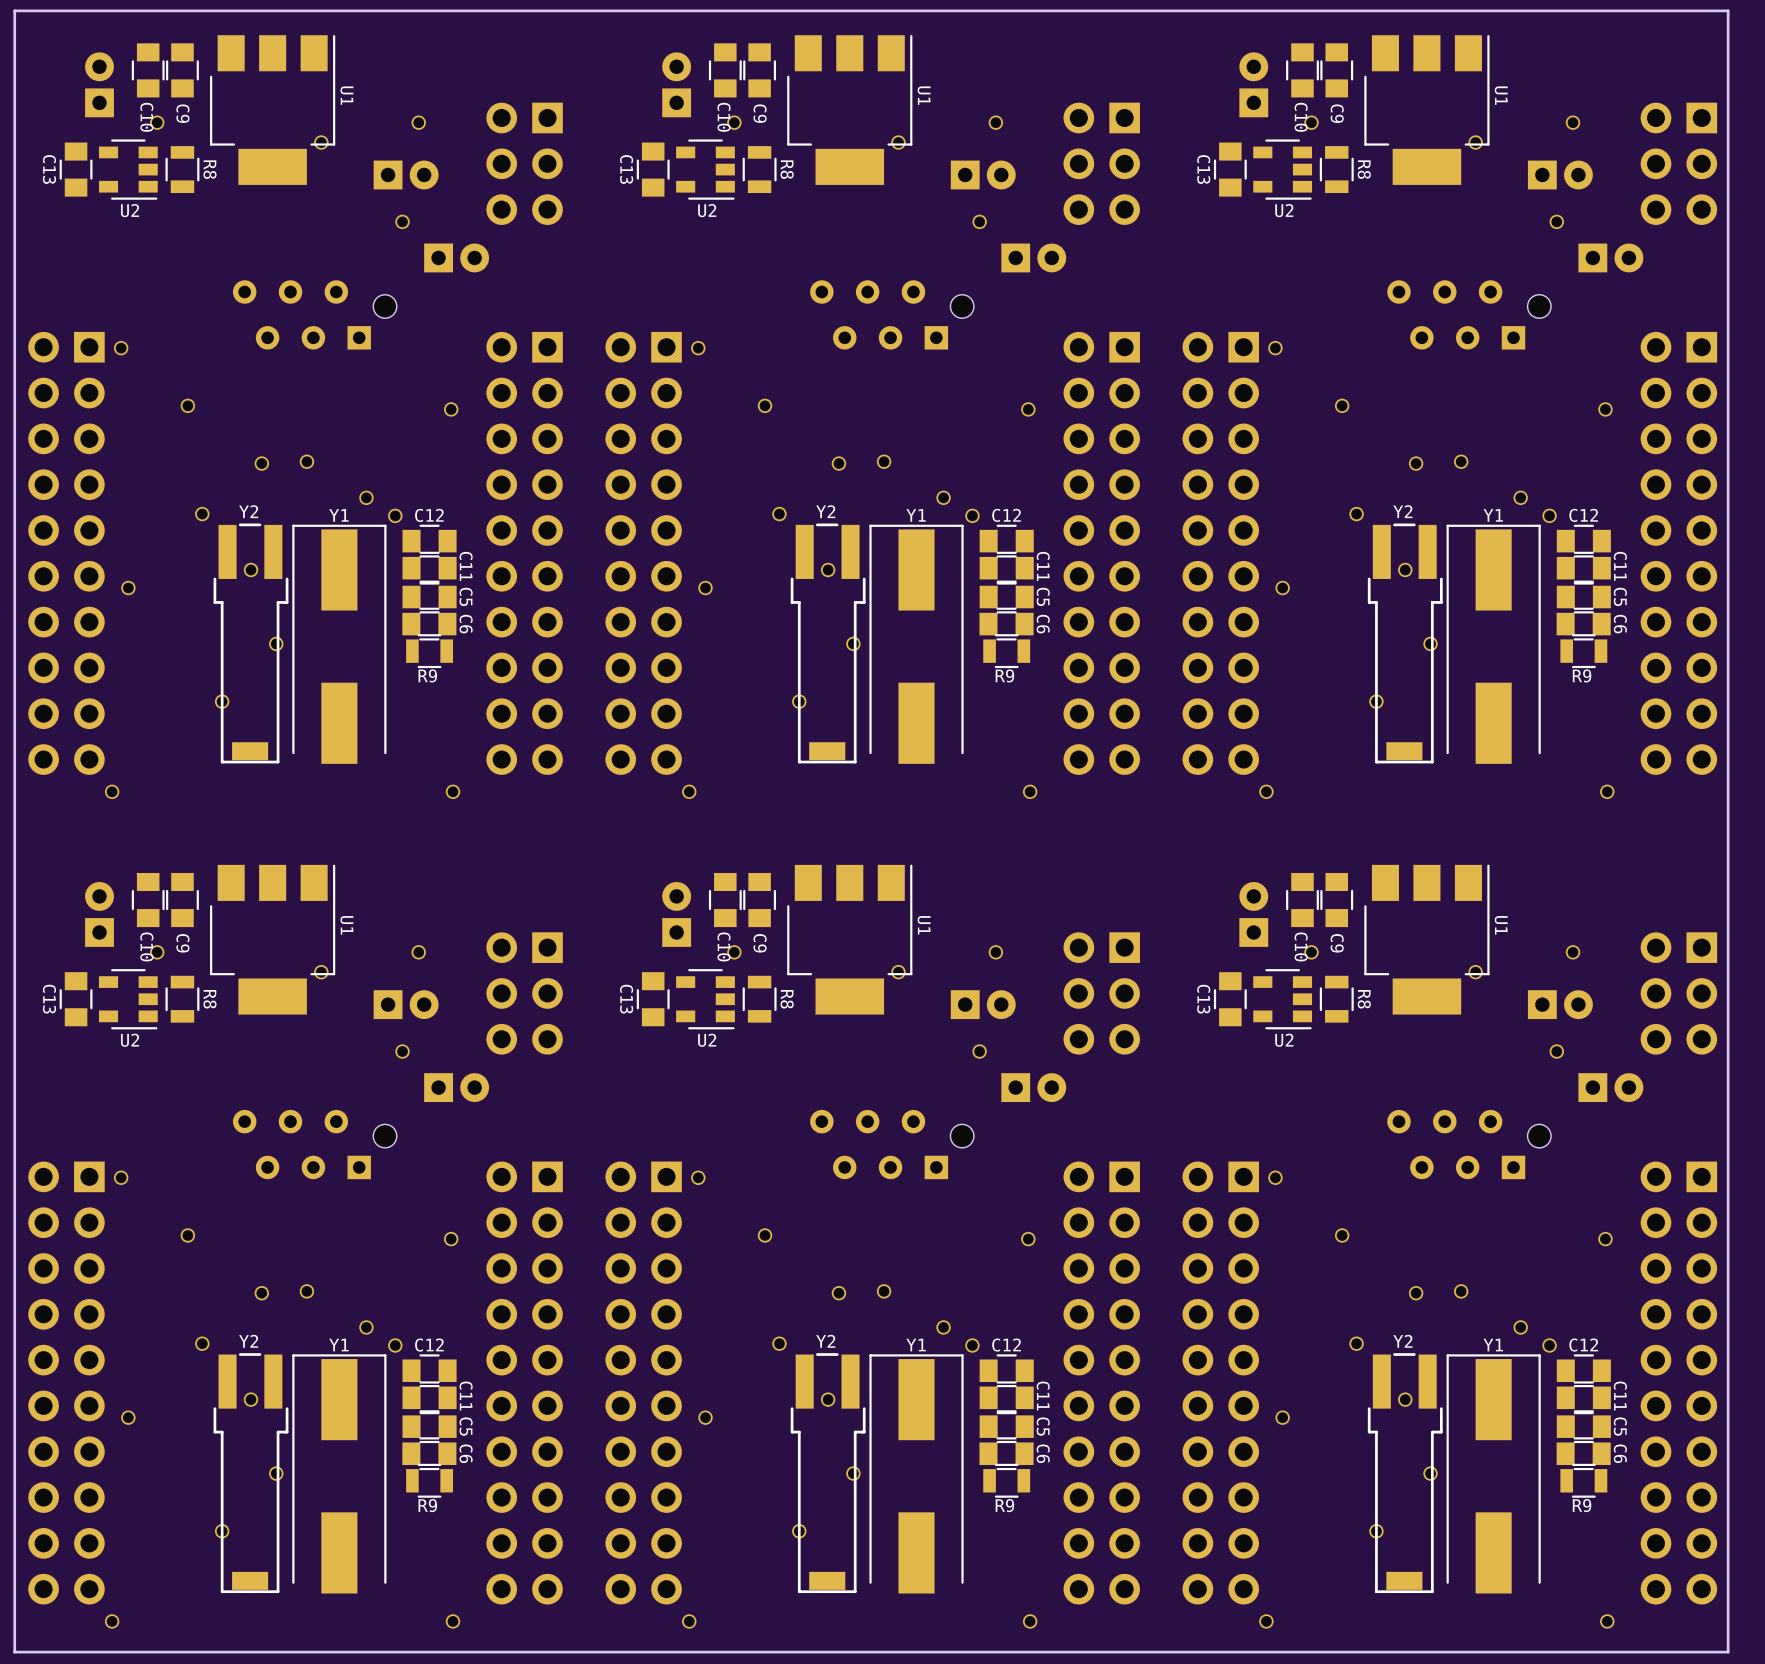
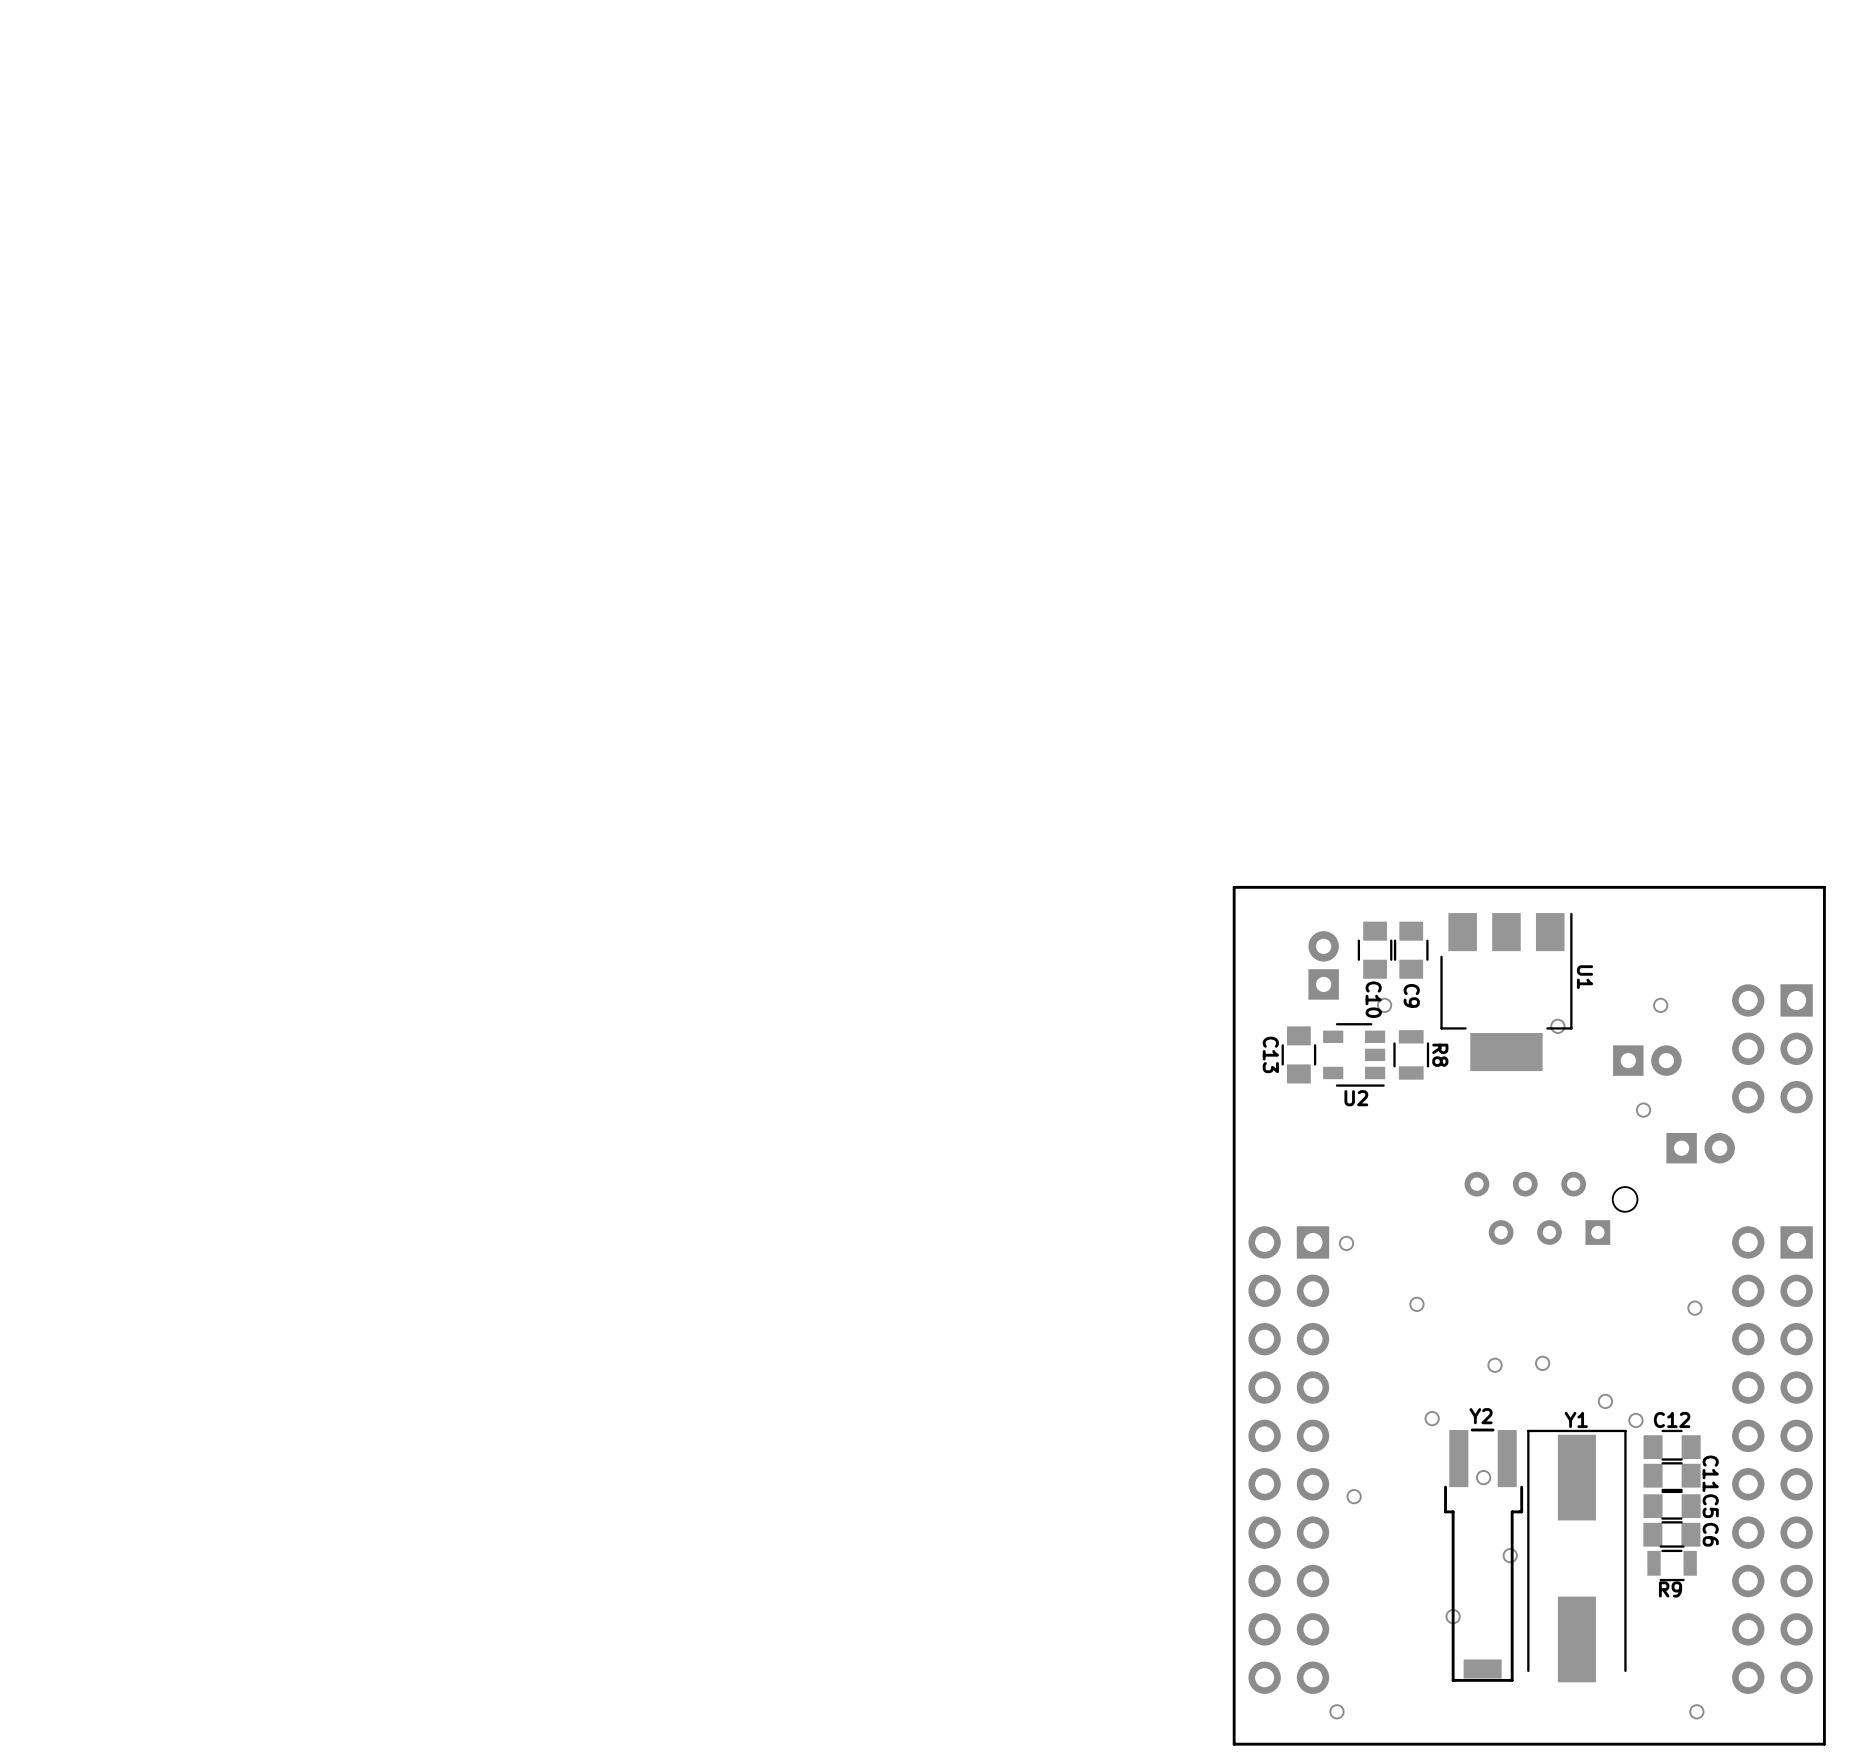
C10: (148, 70) -> none
C9: (182, 70) -> none
C10: (725, 70) -> none
C9: (759, 70) -> none
C10: (1302, 70) -> none
C9: (1336, 70) -> none
part: (99, 84) -> none
part: (676, 84) -> none
part: (1253, 84) -> none
U1: (272, 109) -> none
U1: (849, 109) -> none
U1: (1426, 109) -> none
part: (157, 122) -> none
part: (418, 122) -> none
part: (734, 122) -> none
part: (995, 122) -> none
part: (1311, 122) -> none
part: (1573, 122) -> none
part: (321, 142) -> none
part: (898, 142) -> none
part: (1475, 142) -> none
part: (524, 163) -> none
part: (1101, 163) -> none
part: (1678, 163) -> none
C13: (76, 169) -> none
U2: (128, 169) -> none
R8: (182, 169) -> none
C13: (653, 169) -> none
U2: (705, 169) -> none
R8: (759, 169) -> none
C13: (1230, 169) -> none
U2: (1282, 169) -> none
R8: (1336, 169) -> none
part: (406, 174) -> none
part: (983, 174) -> none
part: (1560, 174) -> none
part: (402, 221) -> none
part: (979, 221) -> none
part: (1556, 221) -> none
part: (456, 257) -> none
part: (1033, 257) -> none
part: (1610, 257) -> none
part: (314, 314) -> none
part: (892, 314) -> none
part: (1469, 314) -> none
part: (121, 348) -> none
part: (698, 348) -> none
part: (1275, 348) -> none
part: (187, 405) -> none
part: (765, 405) -> none
part: (1342, 405) -> none
part: (451, 409) -> none
part: (1028, 409) -> none
part: (1605, 409) -> none
part: (306, 461) -> none
part: (884, 461) -> none
part: (1461, 461) -> none
part: (261, 463) -> none
part: (838, 463) -> none
part: (1416, 463) -> none
part: (366, 497) -> none
part: (943, 497) -> none
part: (1520, 497) -> none
part: (202, 514) -> none
part: (779, 514) -> none
part: (1356, 514) -> none
part: (395, 515) -> none
part: (972, 515) -> none
part: (1549, 515) -> none
C12: (429, 541) -> none
C12: (1006, 541) -> none
C12: (1583, 541) -> none
part: (66, 553) -> none
part: (524, 553) -> none
part: (643, 553) -> none
part: (1101, 553) -> none
part: (1220, 553) -> none
part: (1678, 553) -> none
C11: (429, 568) -> none
C11: (1006, 568) -> none
C11: (1583, 568) -> none
part: (251, 569) -> none
part: (828, 569) -> none
part: (1405, 569) -> none
part: (128, 588) -> none
part: (705, 588) -> none
part: (1282, 588) -> none
C5: (429, 597) -> none
C5: (1006, 597) -> none
C5: (1583, 597) -> none
C6: (429, 624) -> none
C6: (1006, 624) -> none
C6: (1583, 624) -> none
Y2: (251, 643) -> none
part: (276, 643) -> none
Y2: (828, 643) -> none
part: (853, 643) -> none
Y2: (1405, 643) -> none
part: (1430, 643) -> none
Y1: (339, 644) -> none
Y1: (916, 644) -> none
Y1: (1493, 644) -> none
R9: (429, 651) -> none
R9: (1006, 651) -> none
R9: (1583, 651) -> none
part: (222, 701) -> none
part: (799, 701) -> none
part: (1376, 701) -> none
part: (112, 791) -> none
part: (453, 791) -> none
part: (689, 791) -> none
part: (1030, 791) -> none
part: (1266, 791) -> none
part: (1607, 791) -> none
board edge: (1728, 840) (1728, 10) (14, 10) (14, 1652) (1169, 1652) -> (1824, 887) (1234, 887) (1234, 1744)
C10: (148, 900) -> none
C9: (182, 900) -> none
C10: (725, 900) -> none
C9: (759, 900) -> none
part: (99, 914) -> none
part: (676, 914) -> none
U1: (272, 939) -> none
U1: (849, 939) -> none
part: (157, 952) -> none
part: (418, 952) -> none
part: (734, 952) -> none
part: (995, 952) -> none
part: (321, 972) -> none
part: (898, 972) -> none
part: (524, 993) -> none
part: (1101, 993) -> none
C13: (76, 999) -> none
U2: (128, 999) -> none
R8: (182, 999) -> none
C13: (653, 999) -> none
U2: (705, 999) -> none
R8: (759, 999) -> none
part: (406, 1004) -> none
part: (983, 1004) -> none
part: (402, 1051) -> none
part: (979, 1051) -> none
part: (456, 1087) -> none
part: (1033, 1087) -> none
part: (314, 1144) -> none
part: (892, 1144) -> none
part: (121, 1177) -> none
part: (698, 1177) -> none
part: (187, 1235) -> none
part: (765, 1235) -> none
part: (451, 1239) -> none
part: (1028, 1239) -> none
part: (306, 1291) -> none
part: (884, 1291) -> none
part: (261, 1293) -> none
part: (838, 1293) -> none
part: (366, 1327) -> none
part: (943, 1327) -> none
part: (202, 1343) -> none
part: (779, 1343) -> none
part: (395, 1345) -> none
part: (972, 1345) -> none
C12: (429, 1370) -> none
C12: (1006, 1370) -> none
part: (66, 1383) -> none
part: (524, 1383) -> none
part: (643, 1383) -> none
part: (1101, 1383) -> none
C11: (429, 1397) -> none
C11: (1006, 1397) -> none
part: (251, 1399) -> none
part: (828, 1399) -> none
part: (128, 1417) -> none
part: (705, 1417) -> none
C5: (429, 1426) -> none
C5: (1006, 1426) -> none
C6: (429, 1453) -> none
C6: (1006, 1453) -> none
Y2: (251, 1473) -> none
part: (276, 1473) -> none
Y1: (339, 1473) -> none
Y2: (828, 1473) -> none
part: (853, 1473) -> none
Y1: (916, 1473) -> none
R9: (429, 1480) -> none
R9: (1006, 1480) -> none
part: (222, 1531) -> none
part: (799, 1531) -> none
part: (112, 1621) -> none
part: (453, 1621) -> none
part: (689, 1621) -> none
part: (1030, 1621) -> none

